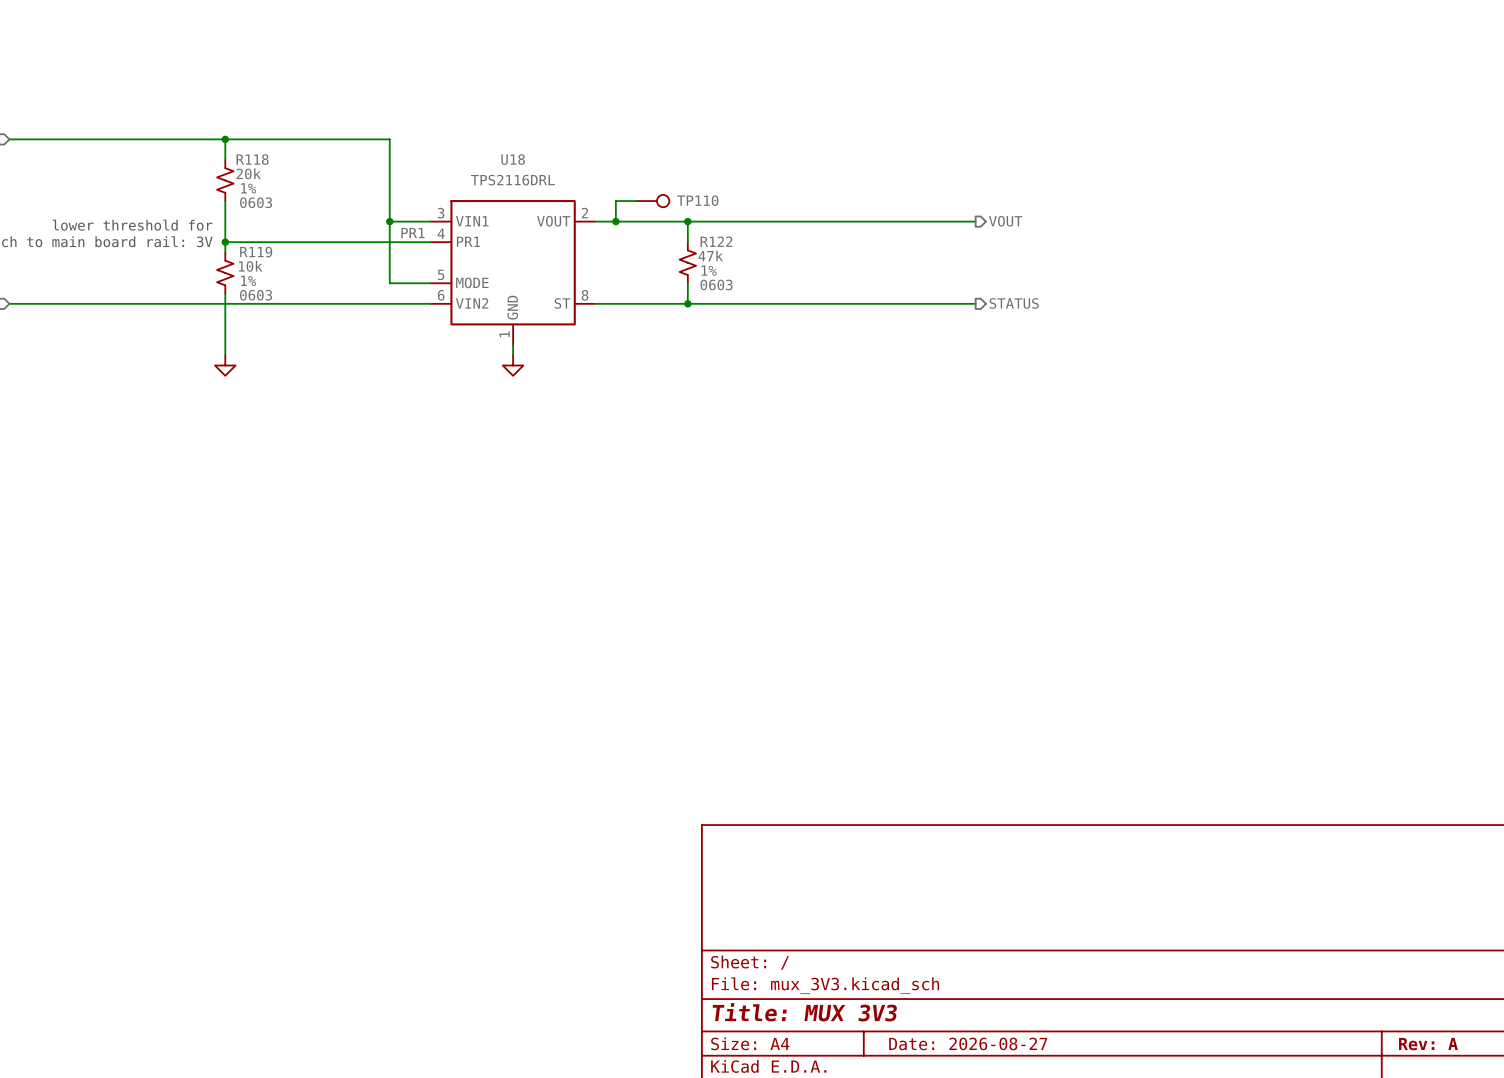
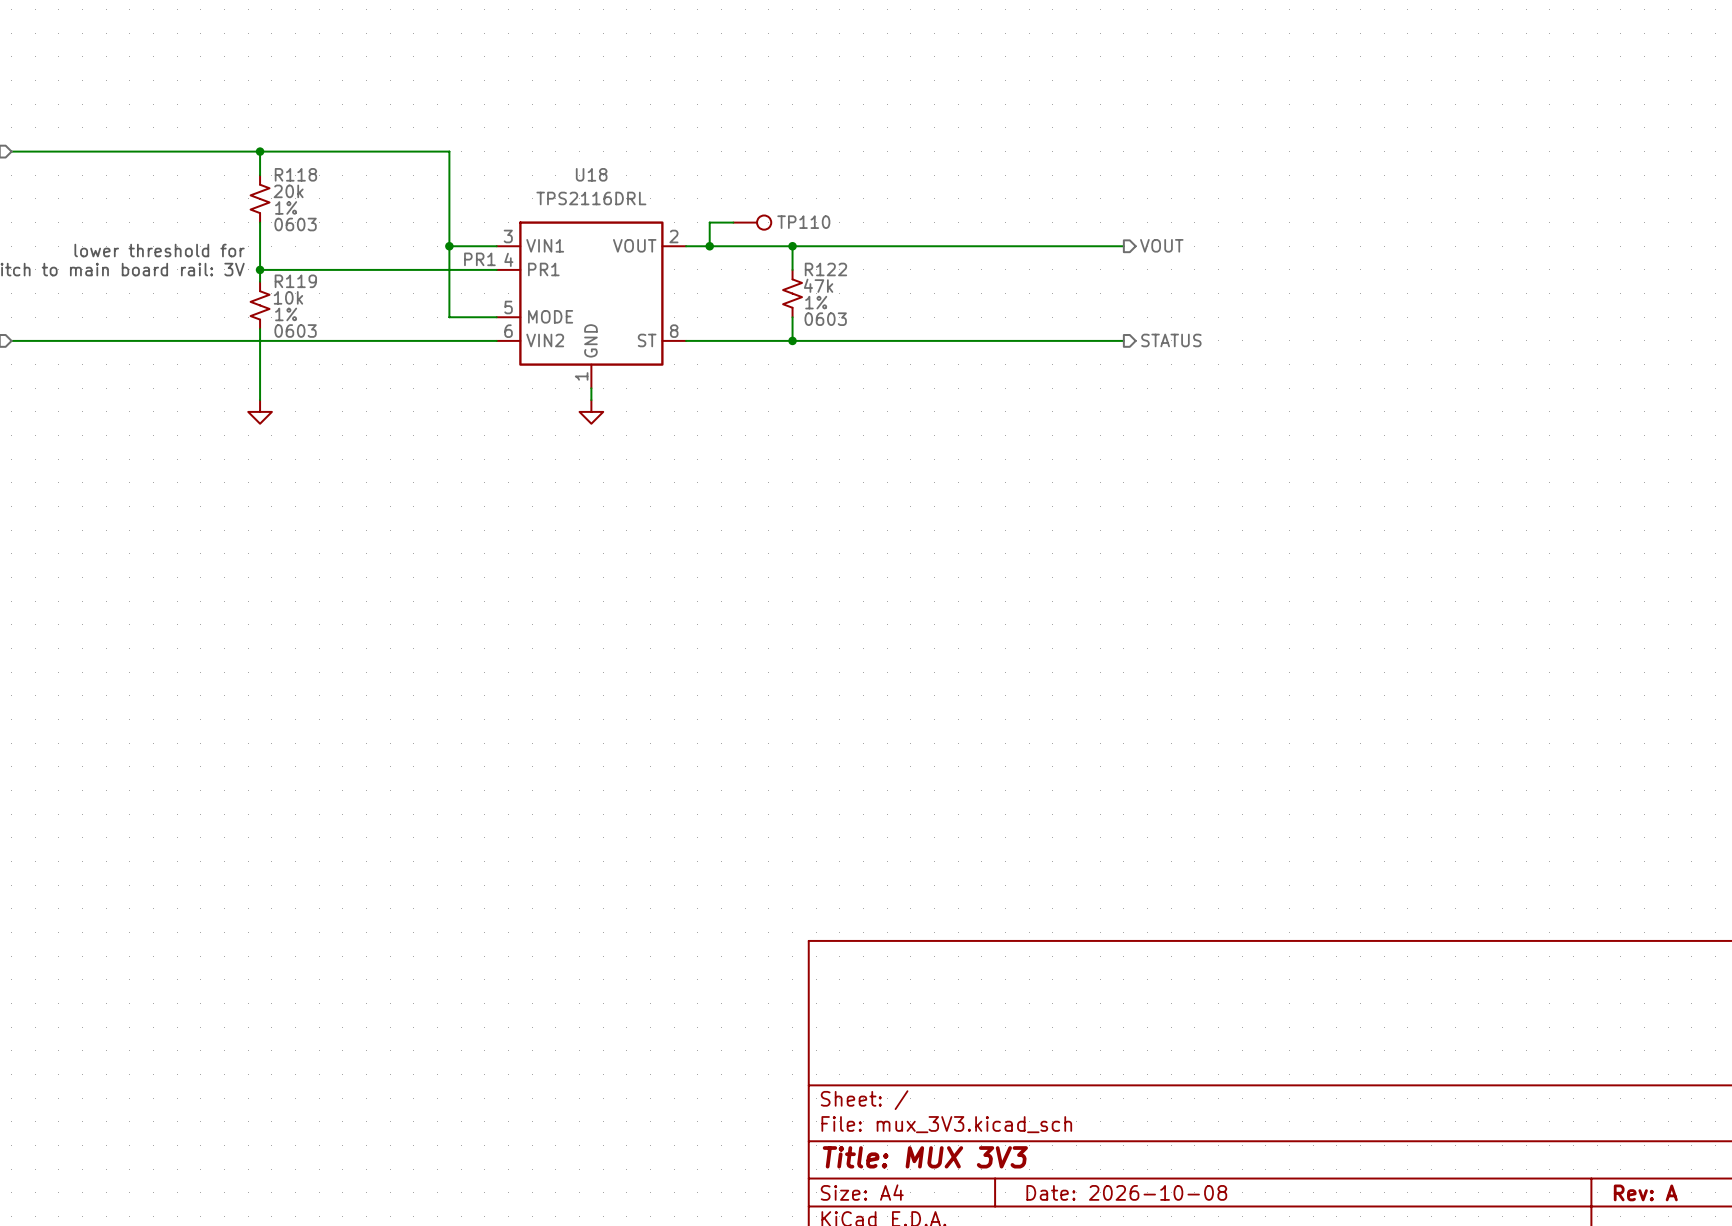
title block: Date: 2026-08-27 (968, 1043) -> Date: 2026-10-08 (1126, 1192)

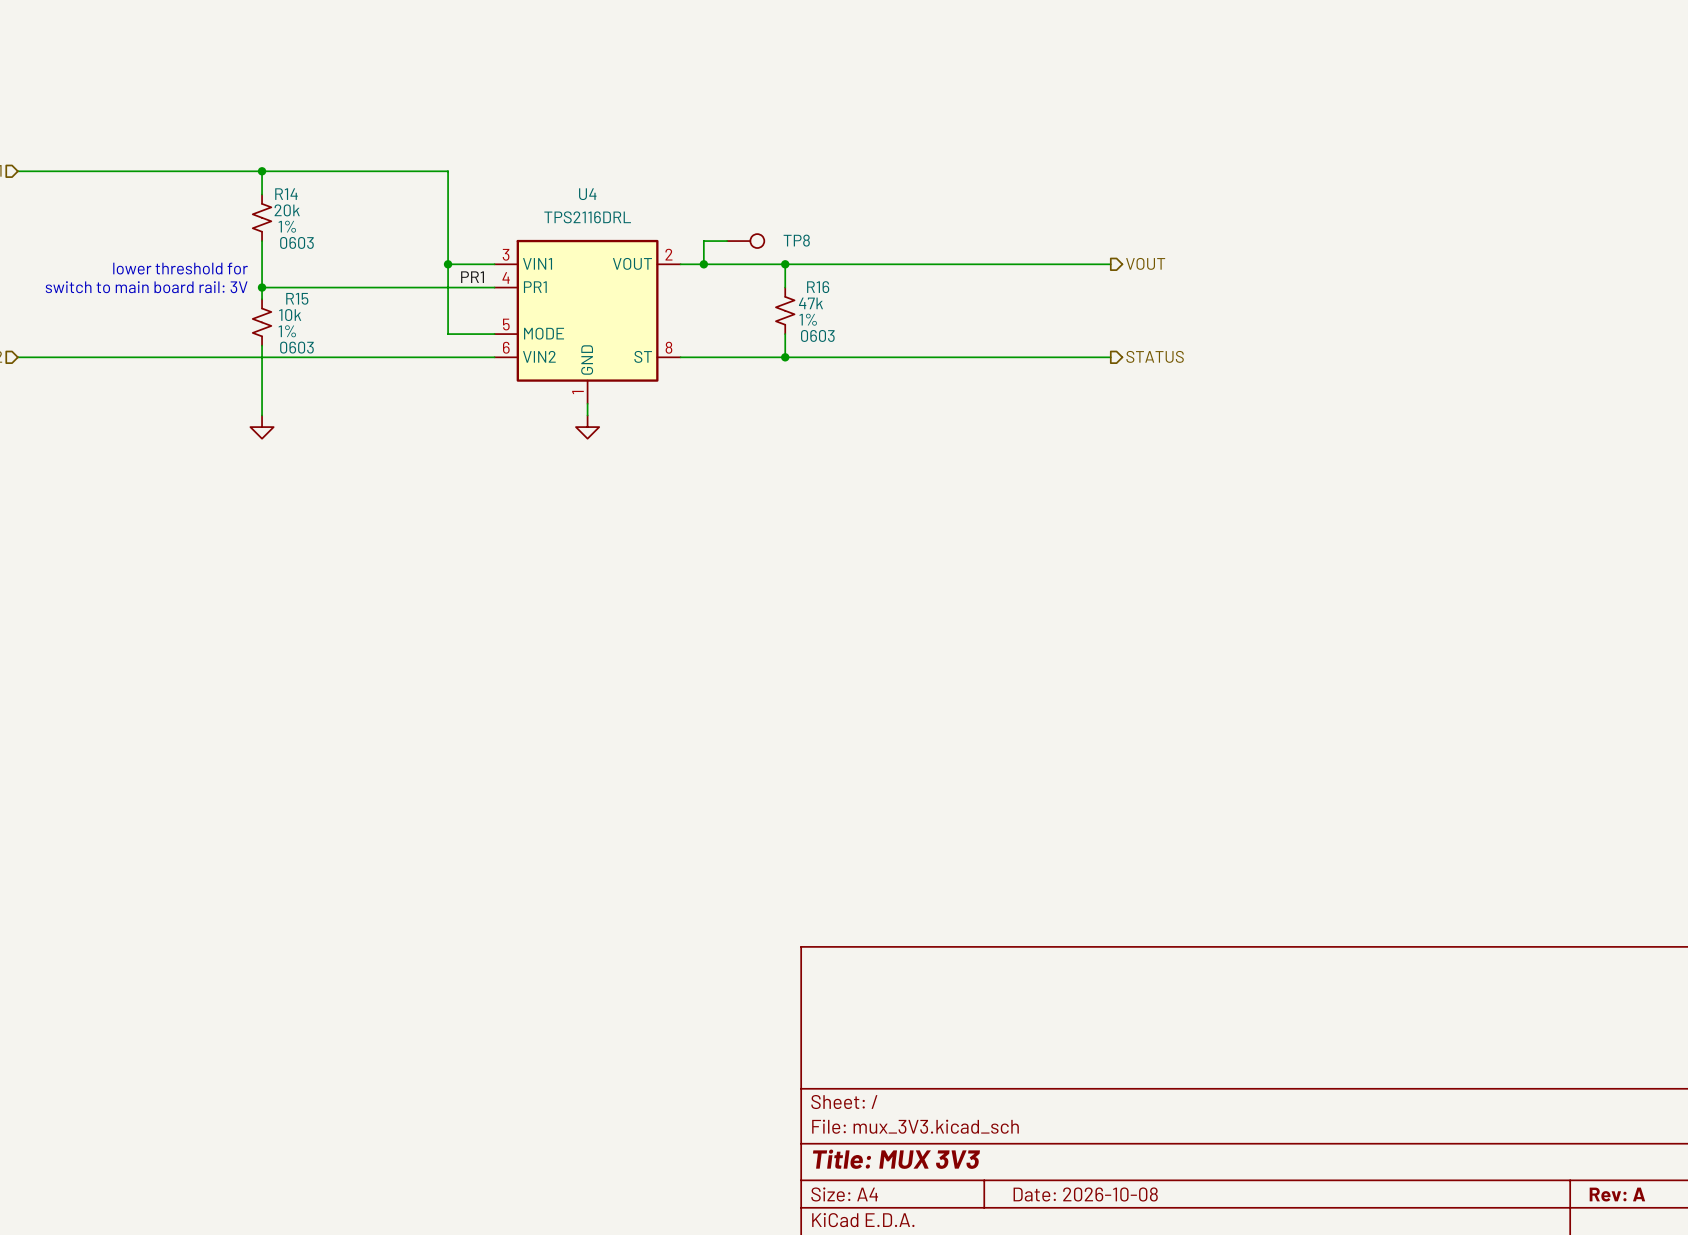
R118 name: R118 (295, 174) -> R14 (286, 194)
U18 name: U18 (591, 174) -> U4 (587, 194)
TP110 name: TP110 (803, 222) -> TP8 (796, 240)
R122 name: R122 (825, 269) -> R16 (818, 287)
R119 name: R119 (295, 281) -> R15 (297, 298)

